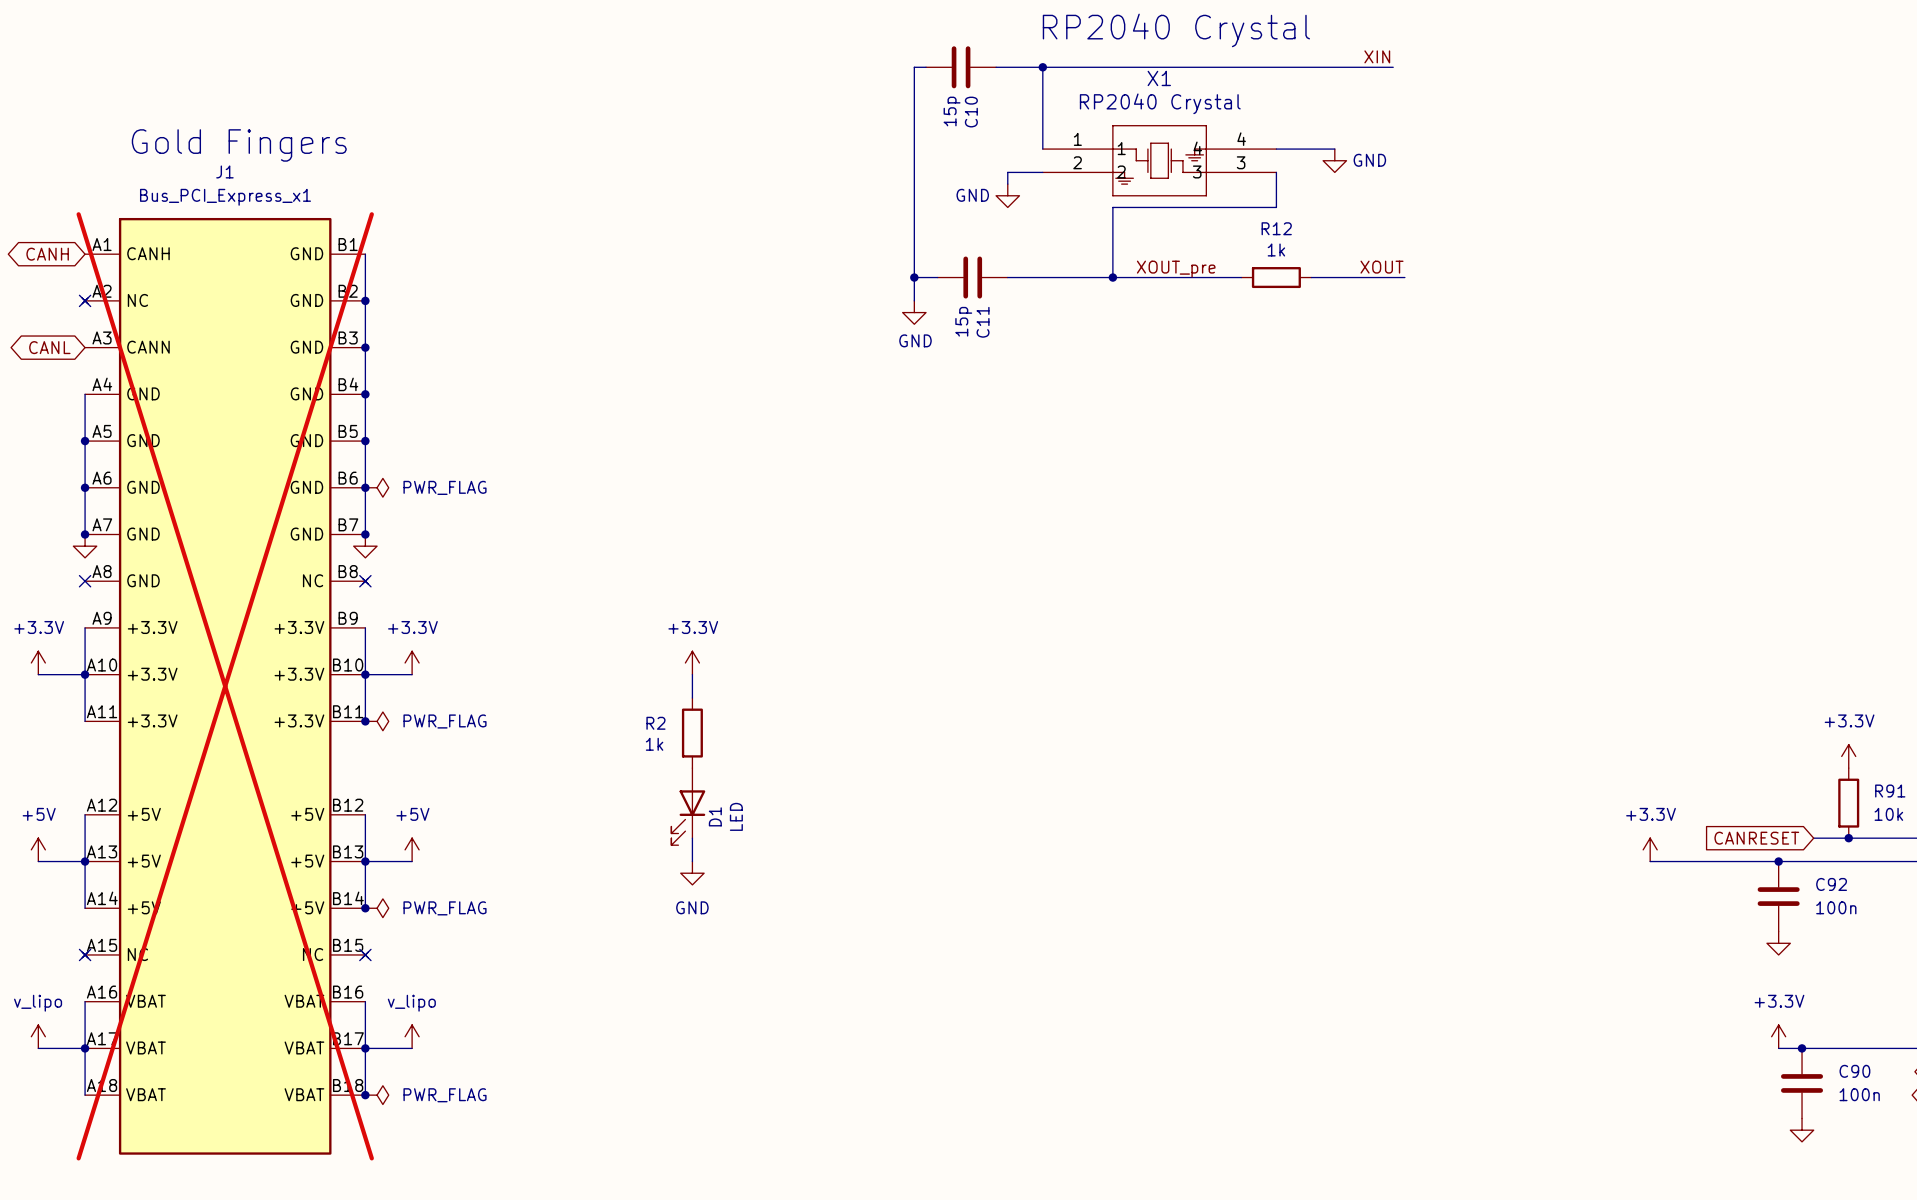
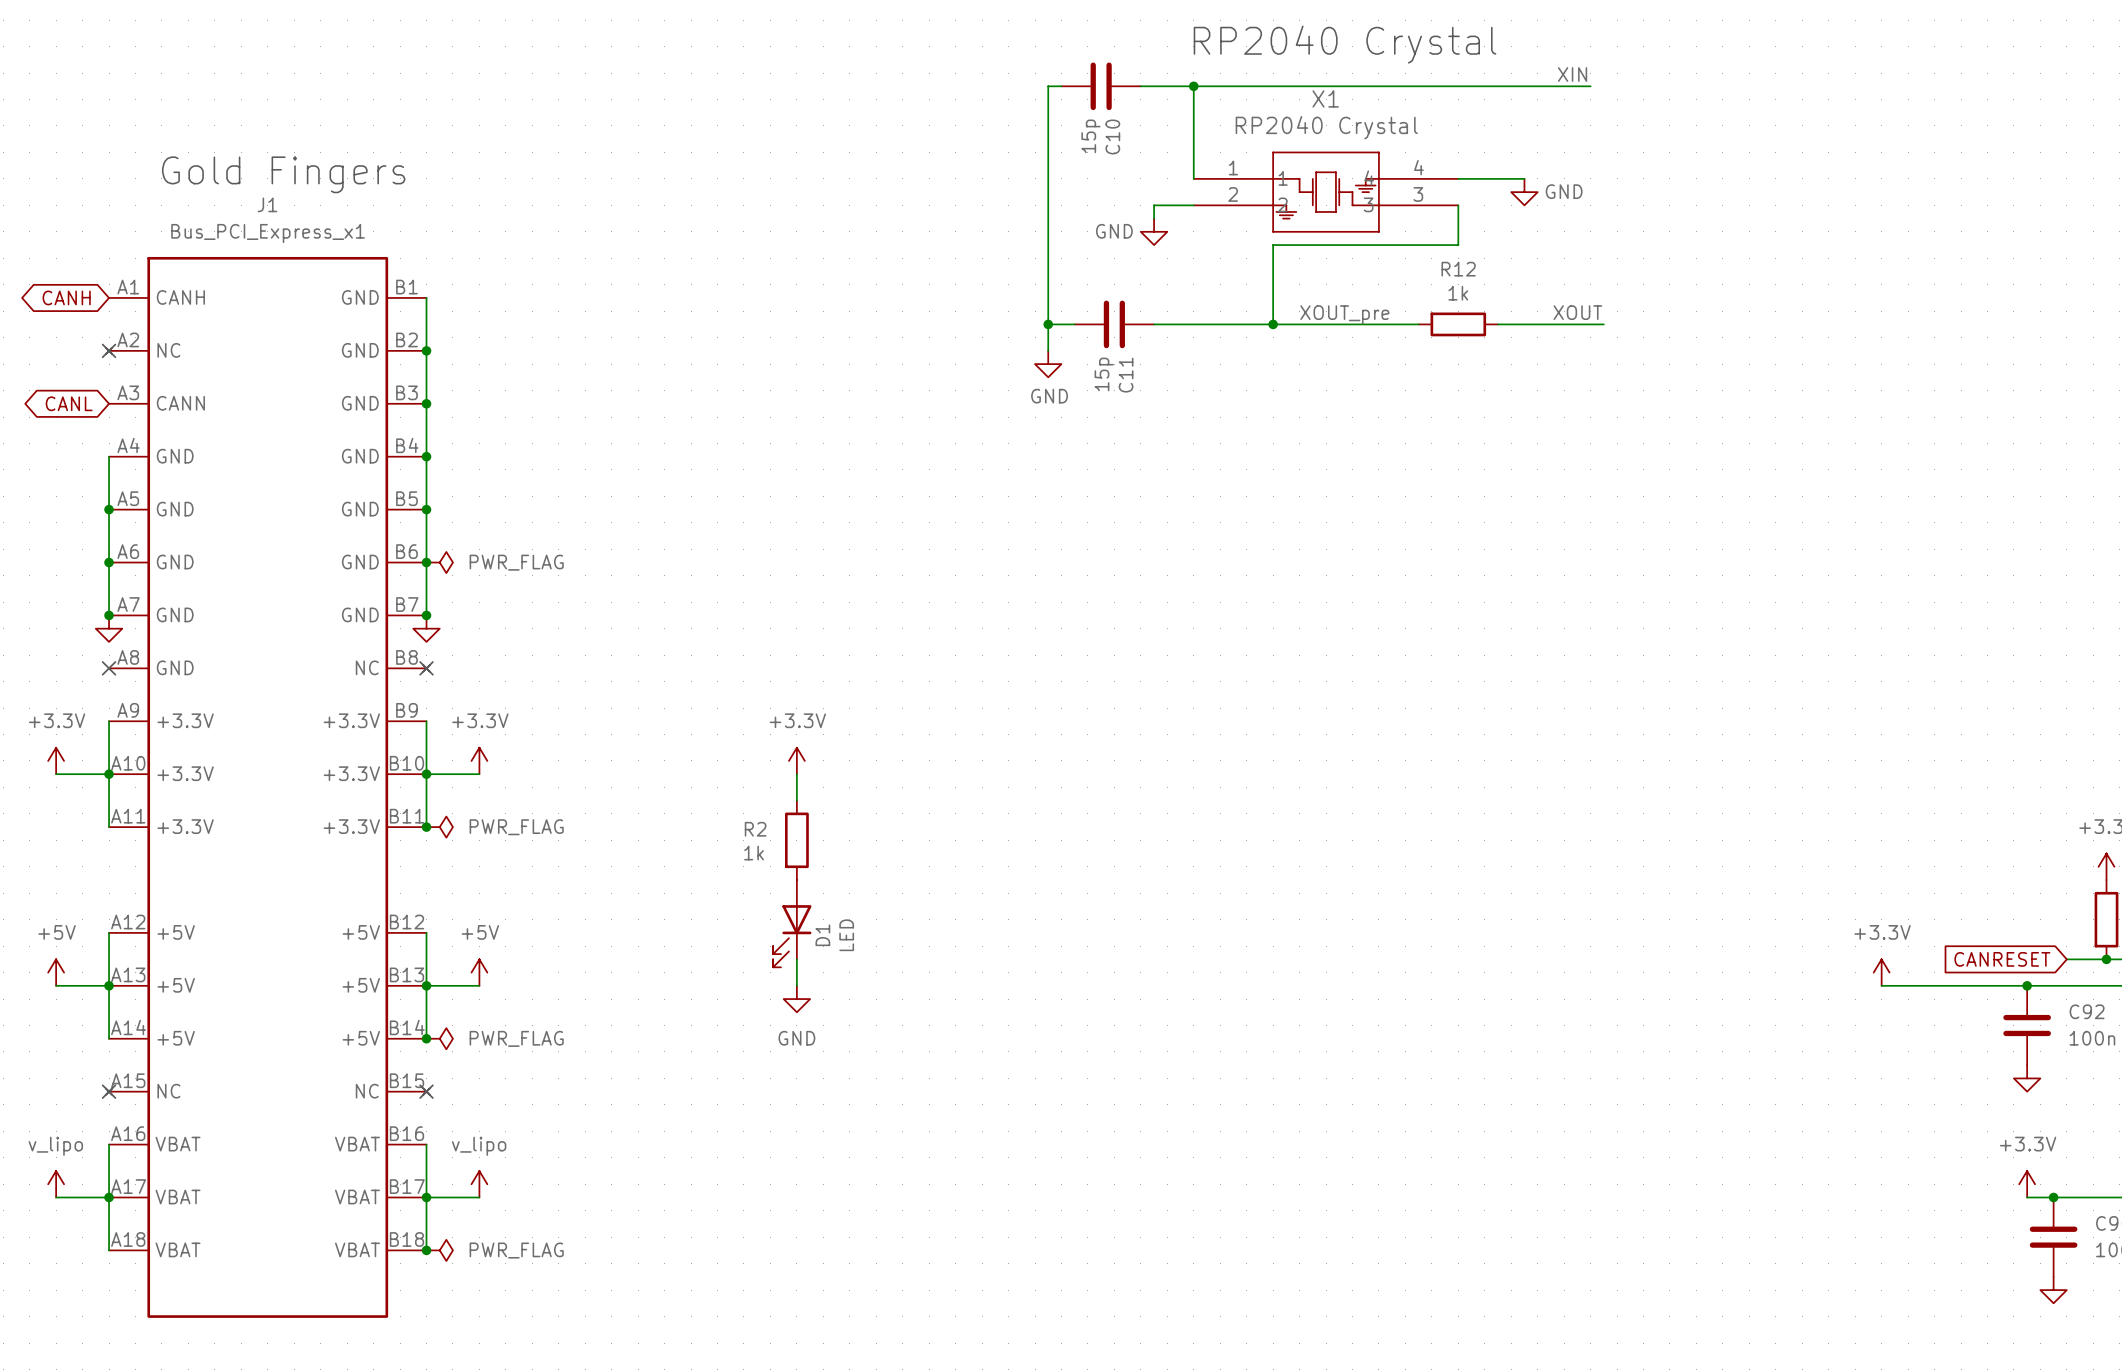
J1 do-not-place cross: (225, 686) -> none

